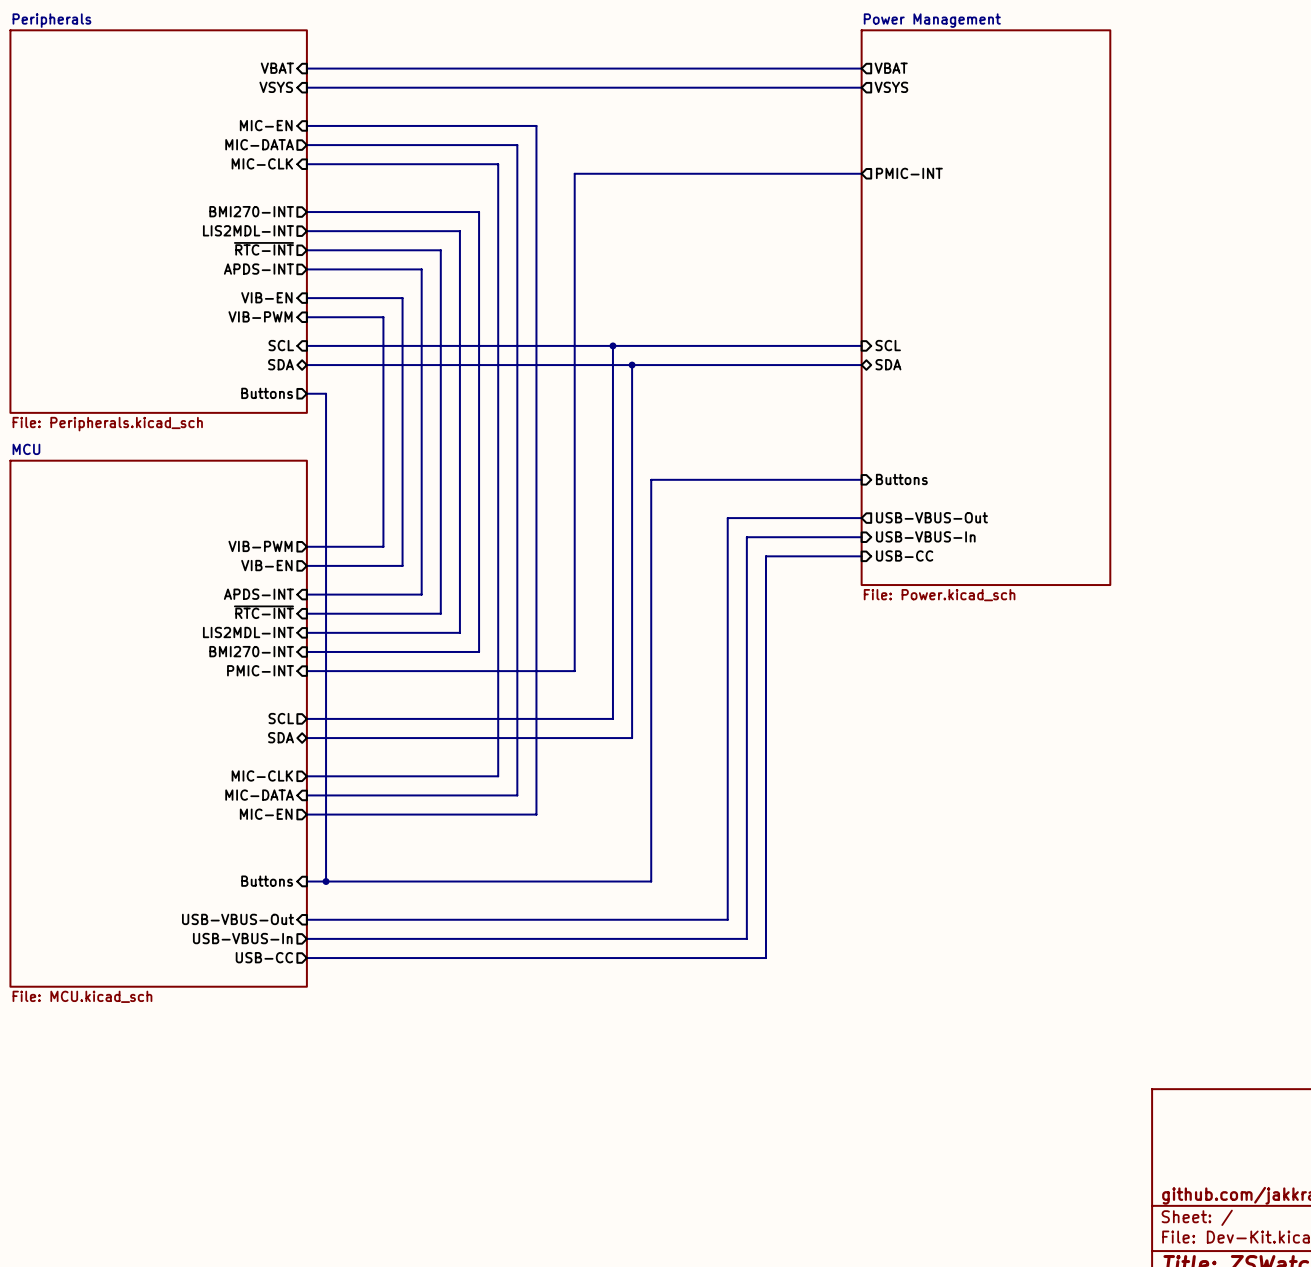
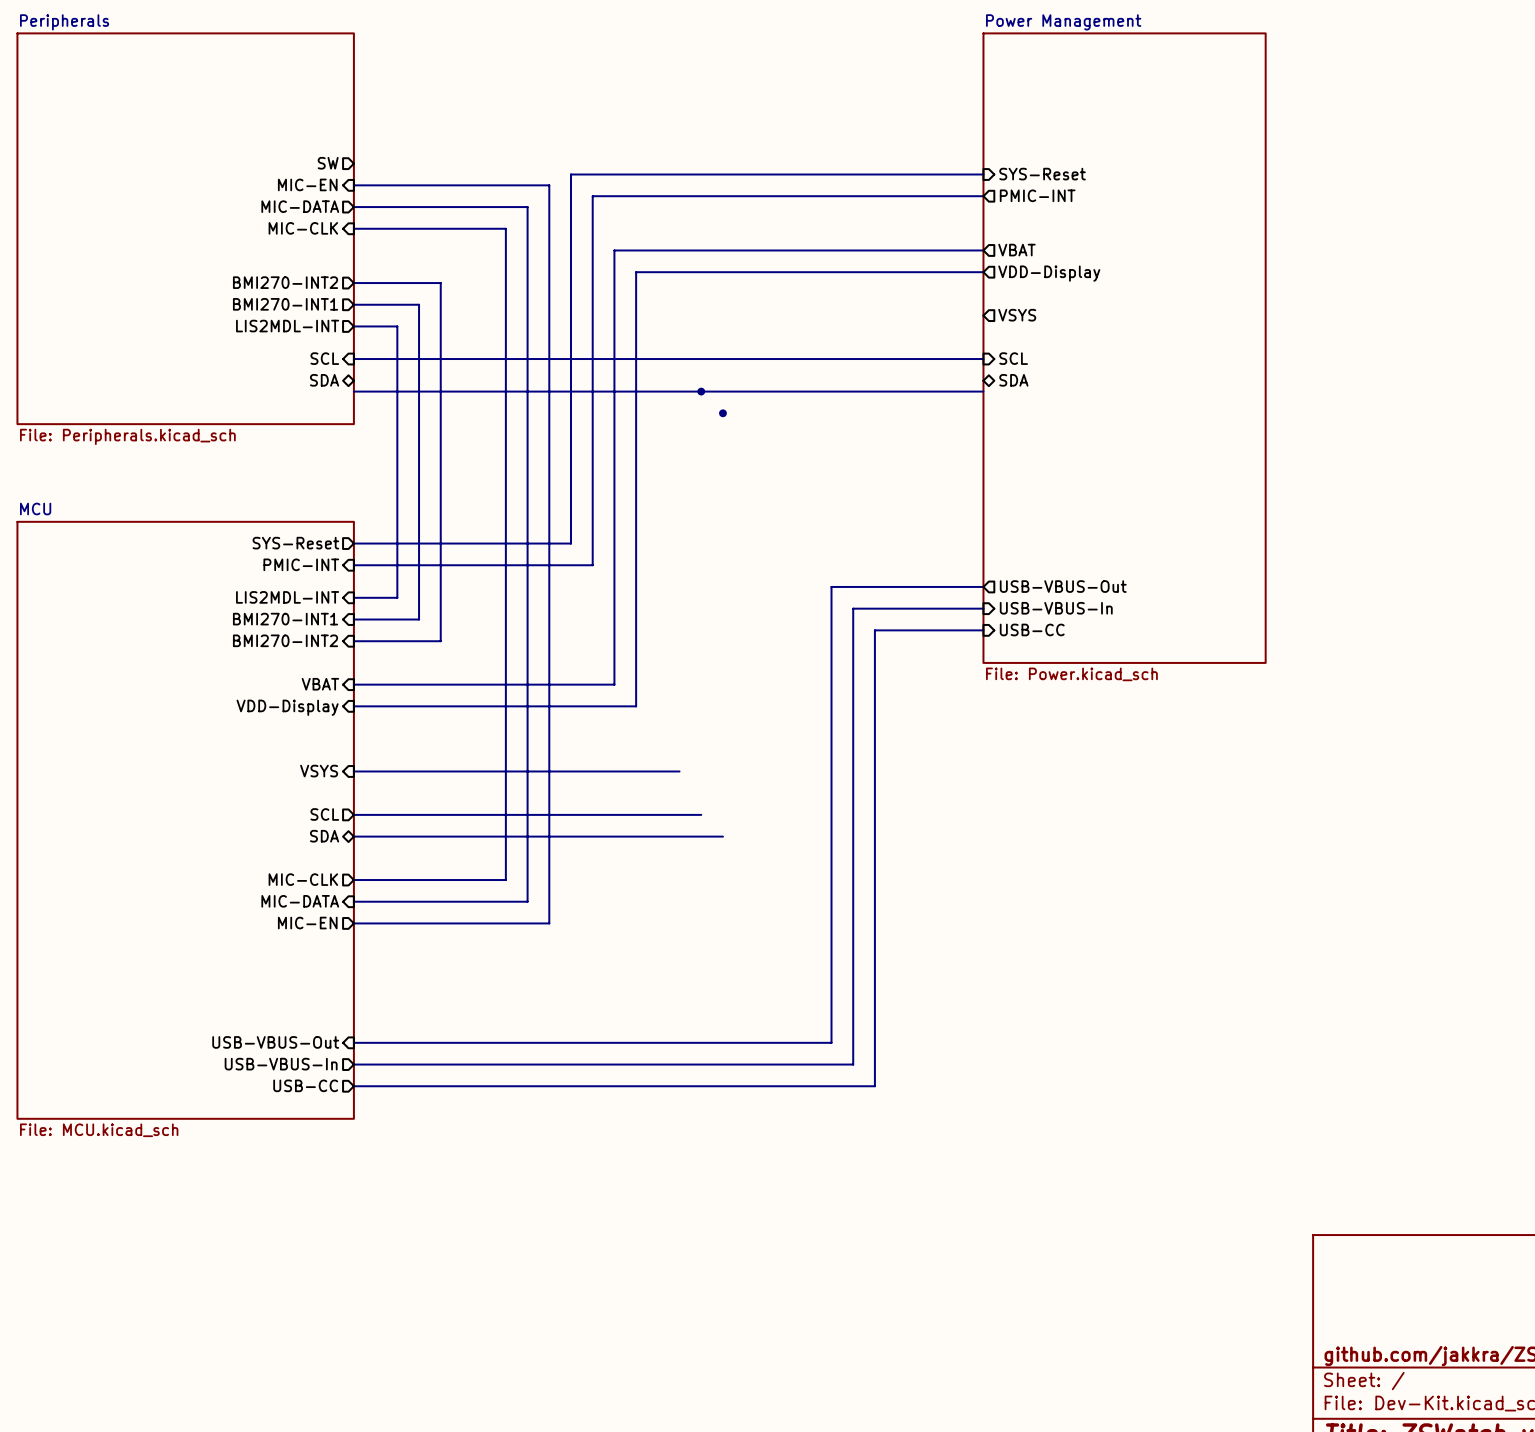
sheet pin: VBAT (277, 68) -> none
wire: (306, 68) (861, 68) -> none
sheet pin position: VBAT (891, 68) -> VBAT (1016, 250)
sheet pin: VSYS (276, 87) -> none
wire: (306, 87) (861, 87) -> none
sheet pin: VSYS (891, 87) -> none
sheet pin: MIC-EN (266, 125) -> none
wire: (306, 125) (536, 125) (536, 221) -> (983, 250) (614, 250)
sheet pin: MIC-DATA (259, 144) -> SW (328, 163)
wire: (306, 145) (517, 145) (517, 173) -> (657, 196) (592, 196)
wire: none -> (983, 174) (571, 174) (571, 185)
sheet pin: none -> SYS-Reset (1042, 174)
sheet pin: MIC-CLK (262, 163) -> MIC-EN (307, 184)
wire: (479, 164) (498, 164) -> (549, 185) (549, 239)
wire: (574, 173) (574, 671) (306, 671) -> none
sheet pin: none -> MIC-DATA (300, 206)
sheet Peripherals: none -> File: Peripherals.kicad_sch (185, 228)
sheet pin: none -> MIC-CLK (303, 228)
sheet pin: BMI270-INT (251, 211) -> none
wire: (306, 212) (479, 212) -> none
sheet Peripherals: File: Peripherals.kicad_sch (158, 221) -> none
sheet pin position: LIS2MDL-INT (248, 230) -> LIS2MDL-INT (287, 326)
wire: (306, 231) (459, 231) -> (353, 207) (527, 207) (527, 261)
wire: none -> (983, 272) (636, 272) (636, 706) (353, 706)
sheet pin: none -> VDD-Display (1049, 273)
sheet pin: ~{RTC-INT} (263, 248) -> BMI270-INT2 (285, 282)
wire: (383, 250) (440, 250) -> (353, 228) (505, 228) (505, 283)
wire: none -> (440, 283) (440, 359) (983, 359)
sheet pin: APDS-INT (258, 269) -> BMI270-INT1 (285, 304)
wire: (364, 269) (421, 269) (421, 594) (306, 594) -> (419, 304) (419, 619)
sheet pin: none -> VSYS (1017, 315)
wire: none -> (353, 326) (397, 326) (397, 597) (353, 597)
sheet pin: VIB-EN (266, 297) -> none
wire: (306, 298) (402, 298) (402, 565) (383, 565) -> none
sheet pin: VIB-PWM (260, 316) -> SCL (324, 358)
sheet pin: SCL (281, 345) -> none
wire: (612, 345) (612, 718) -> none
sheet pin position: SCL (888, 345) -> SCL (1013, 358)
sheet pin position: SDA (281, 364) -> SDA (324, 380)
sheet pin position: SDA (888, 364) -> SDA (1013, 380)
wire: (306, 365) (861, 365) -> none
wire: (632, 365) (632, 738) -> none
sheet pin: Buttons (267, 393) -> none
bus: (306, 393) (326, 393) (326, 881) -> none
sheet pin: none -> SYS-Reset (295, 543)
wire: none -> (353, 543) (571, 543)
wire: (498, 479) (498, 776) (440, 776) -> (505, 695) (505, 880)
bus: (861, 479) (651, 479) (651, 881) (306, 881) -> none
sheet pin: Buttons (901, 479) -> none
wire: none -> (353, 565) (592, 565)
wire: (517, 498) (517, 795) (459, 795) -> (527, 717) (527, 901)
sheet pin shape: output (260, 546) -> input (285, 619)
sheet pin: VIB-PWM (260, 546) -> BMI270-INT1 (285, 619)
wire: (364, 546) (383, 546) -> (440, 641) (440, 619)
sheet pin shape: output (266, 565) -> input (285, 640)
sheet pin: VIB-EN (266, 565) -> BMI270-INT2 (285, 640)
sheet pin: APDS-INT (258, 594) -> none
sheet pin: none -> VBAT (320, 684)
wire: none -> (353, 684) (614, 684)
wire: (536, 604) (536, 814) (479, 814) -> (549, 738) (549, 923)
sheet pin: ~{RTC-INT} (263, 612) -> none
wire: (306, 613) (440, 613) -> none
sheet pin: none -> VDD-Display (287, 707)
sheet pin position: LIS2MDL-INT (248, 632) -> LIS2MDL-INT (287, 597)
wire: (306, 632) (459, 632) -> none
sheet pin: BMI270-INT (251, 651) -> none
wire: (306, 651) (479, 651) -> none
sheet pin position: PMIC-INT (260, 670) -> PMIC-INT (301, 564)
sheet pin: none -> VSYS (319, 771)
wire: none -> (353, 771) (679, 771)
sheet pin: Buttons (267, 881) -> none
junction: (326, 881) -> none

